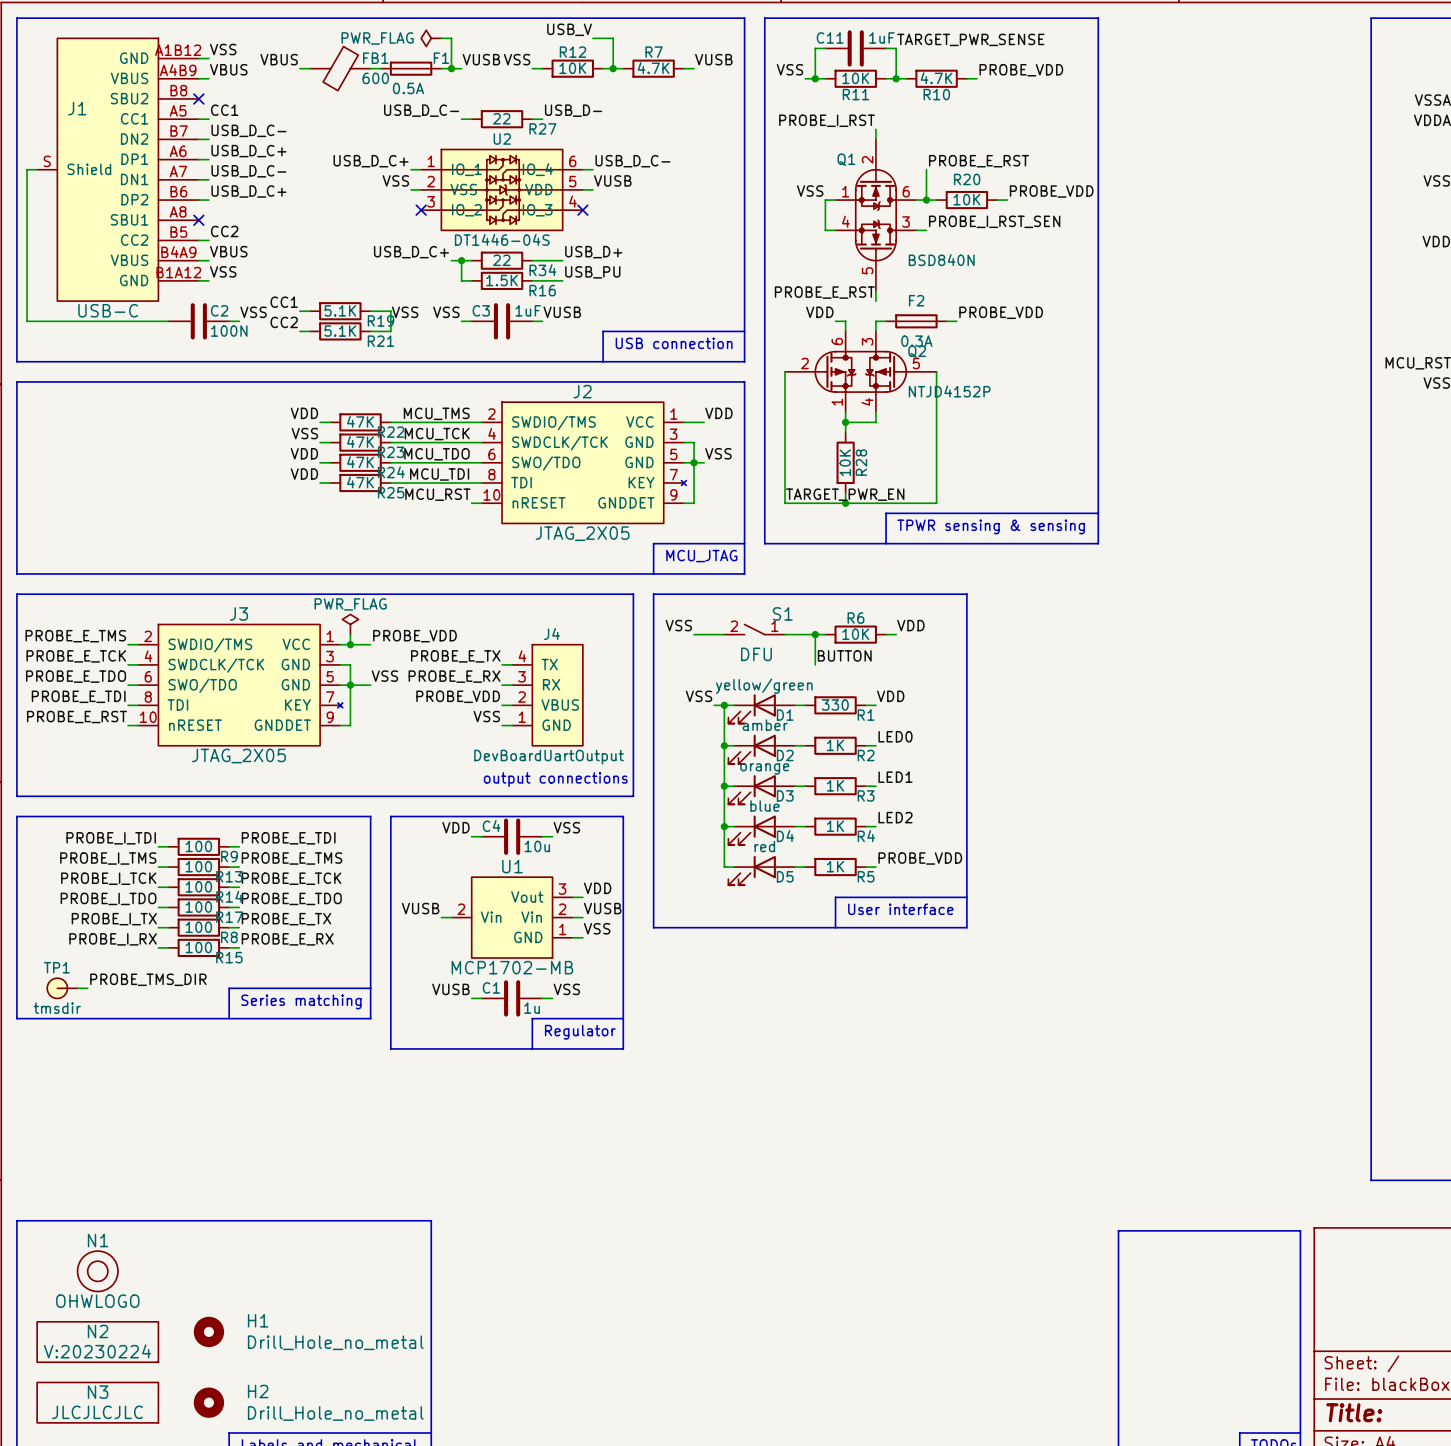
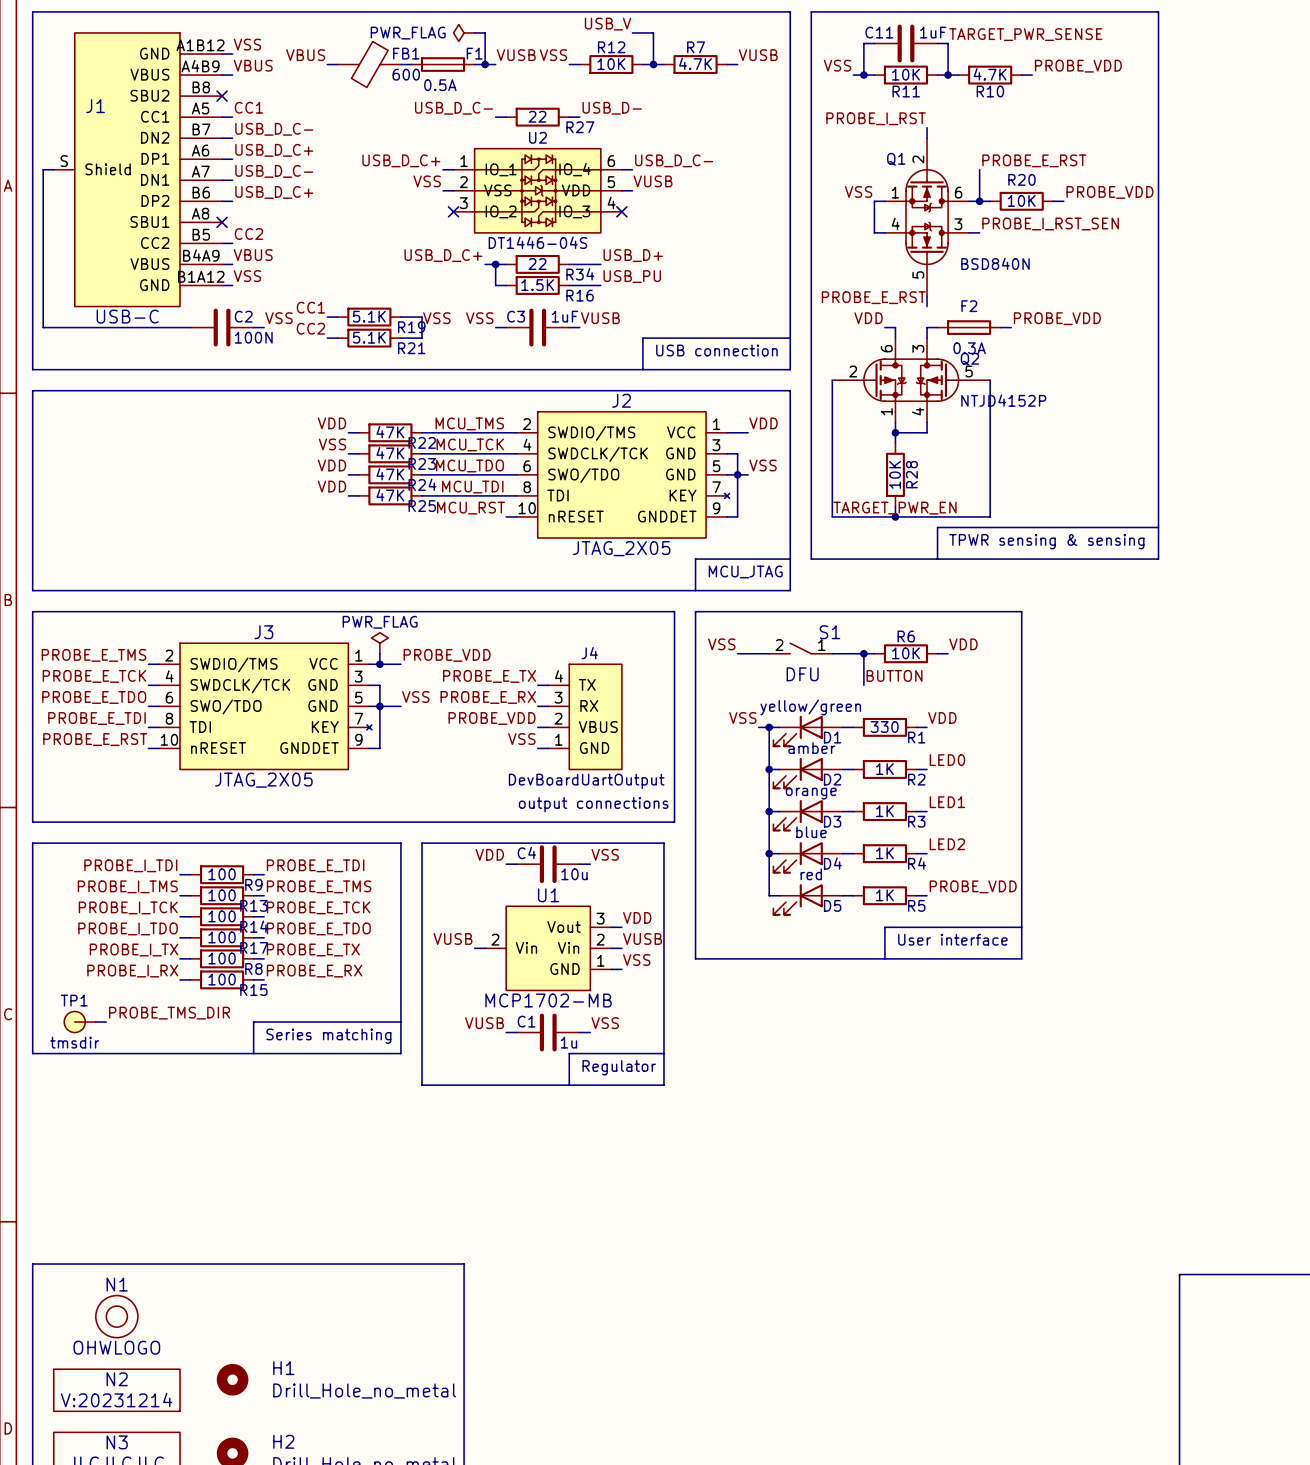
N2 value: V:20230224 (97, 1351) -> V:20231214 (116, 1400)

